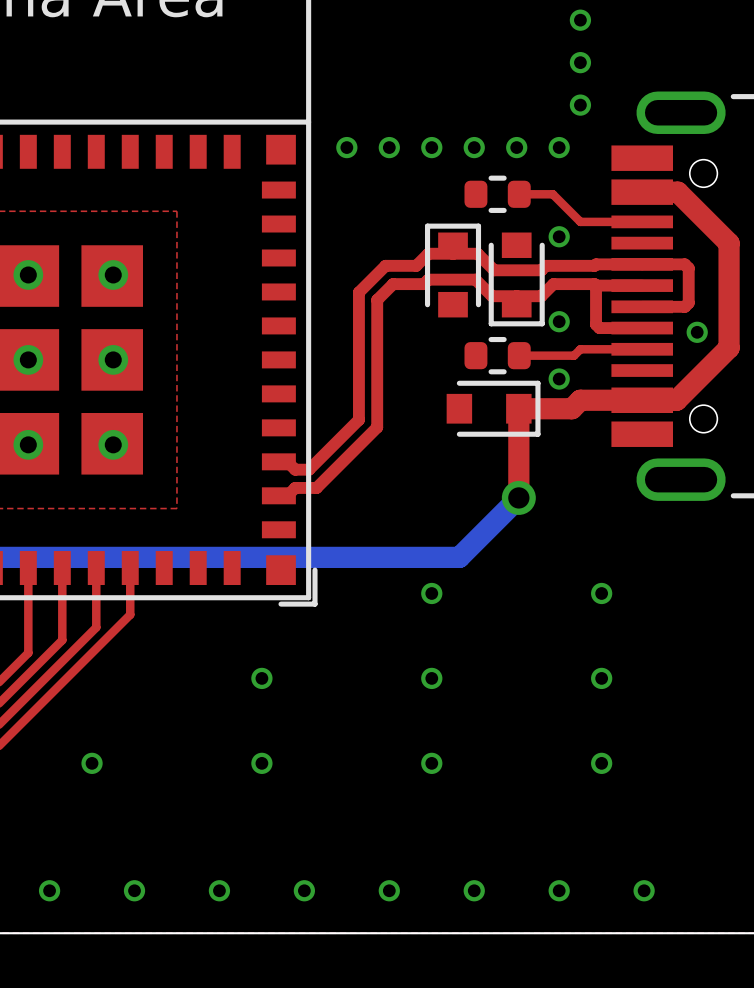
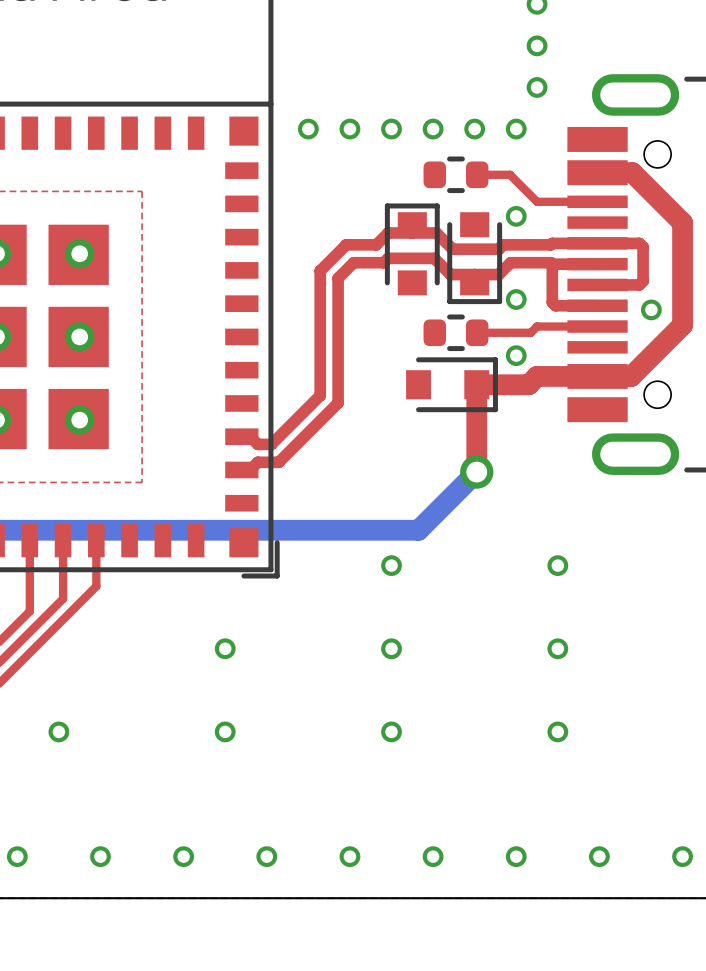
via: none -> (682, 856)

